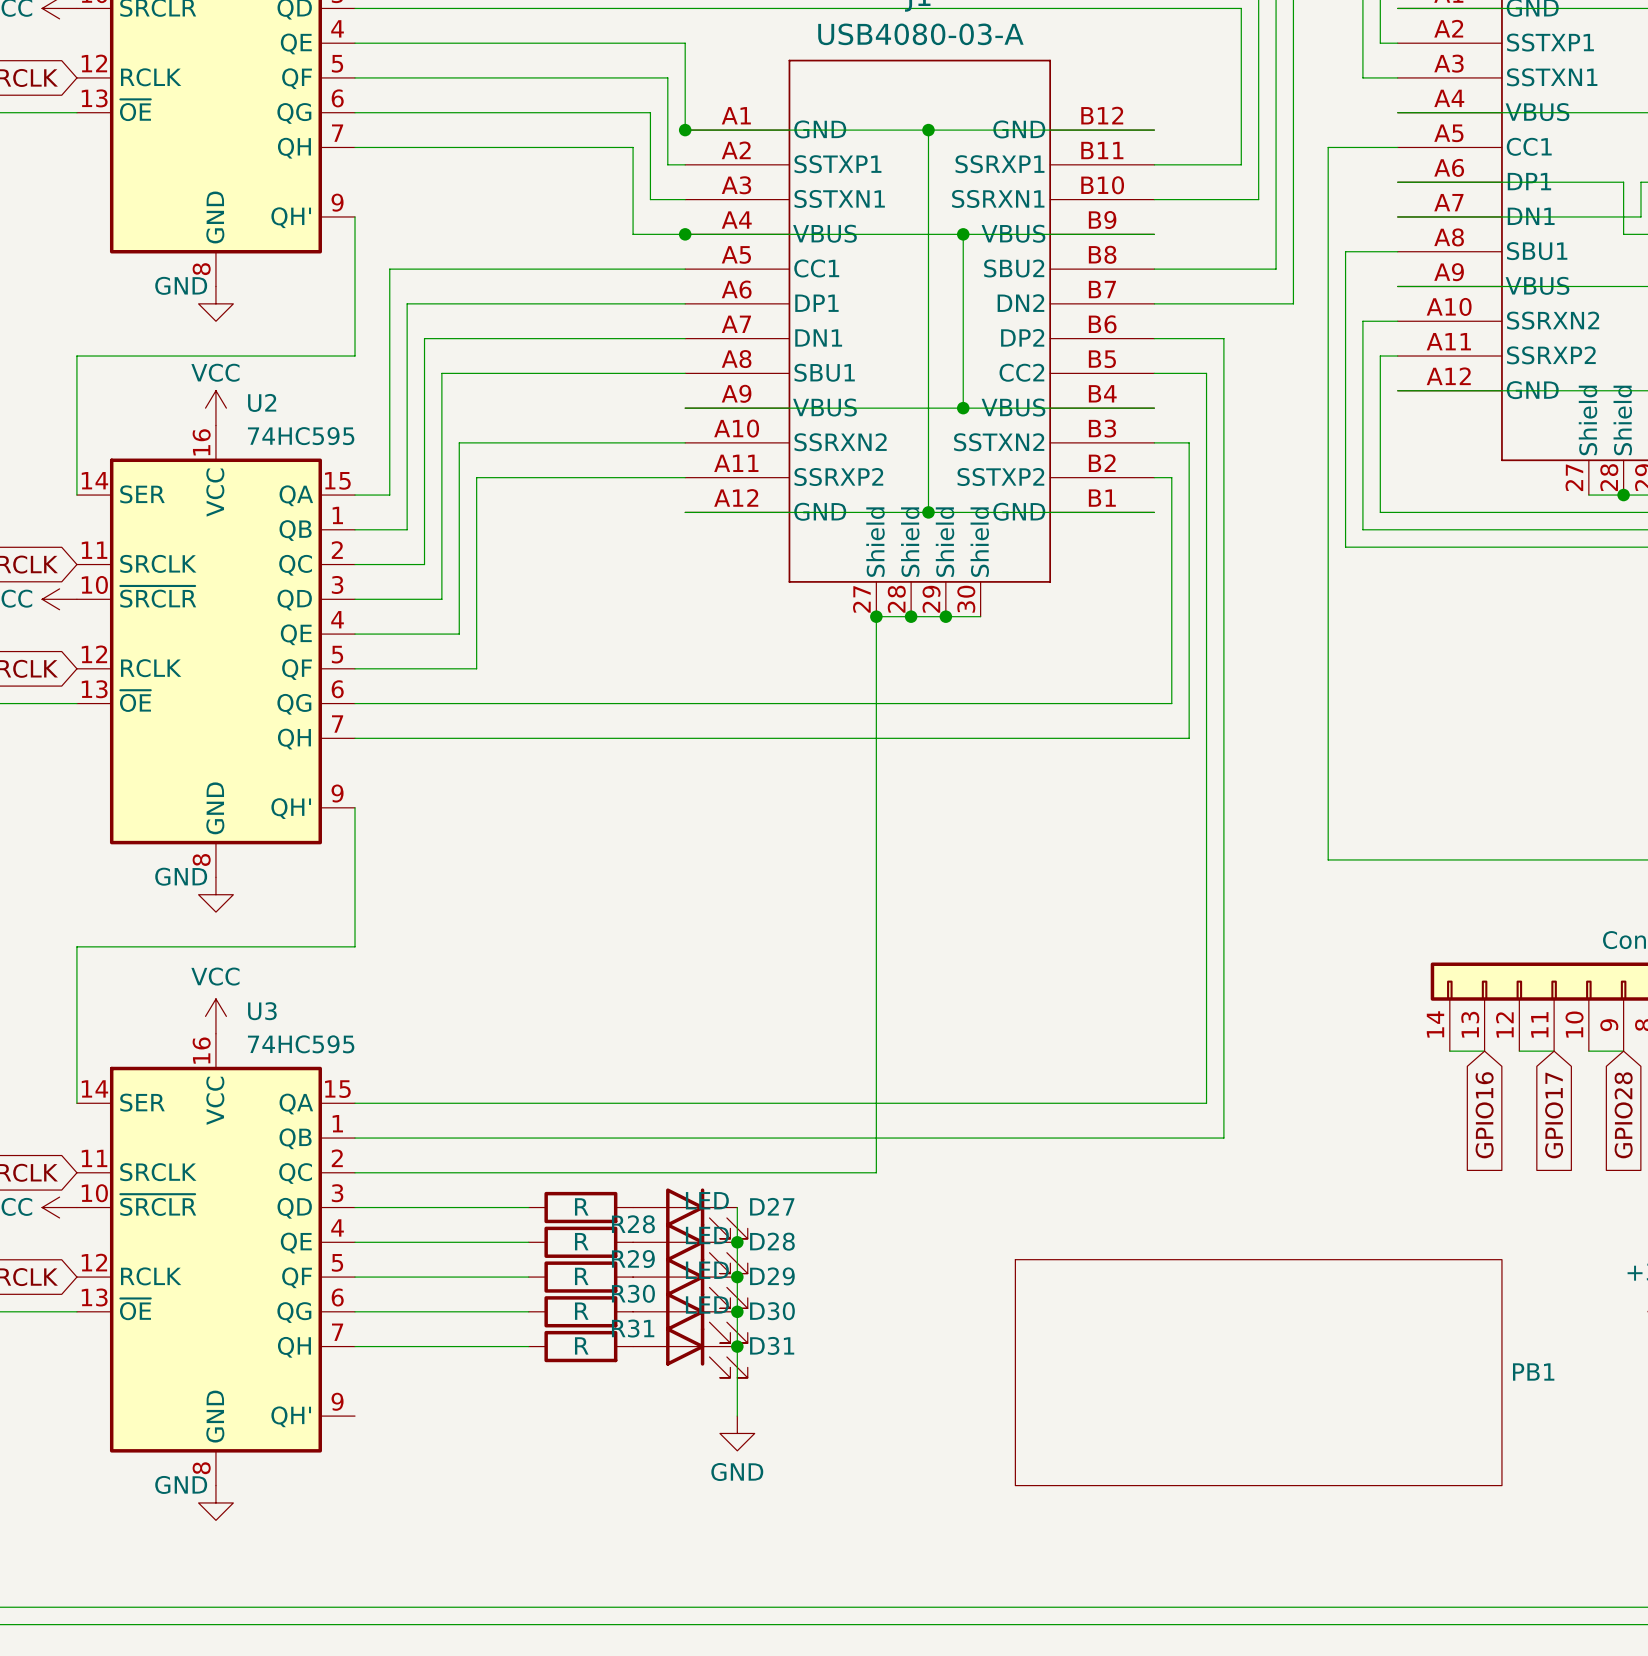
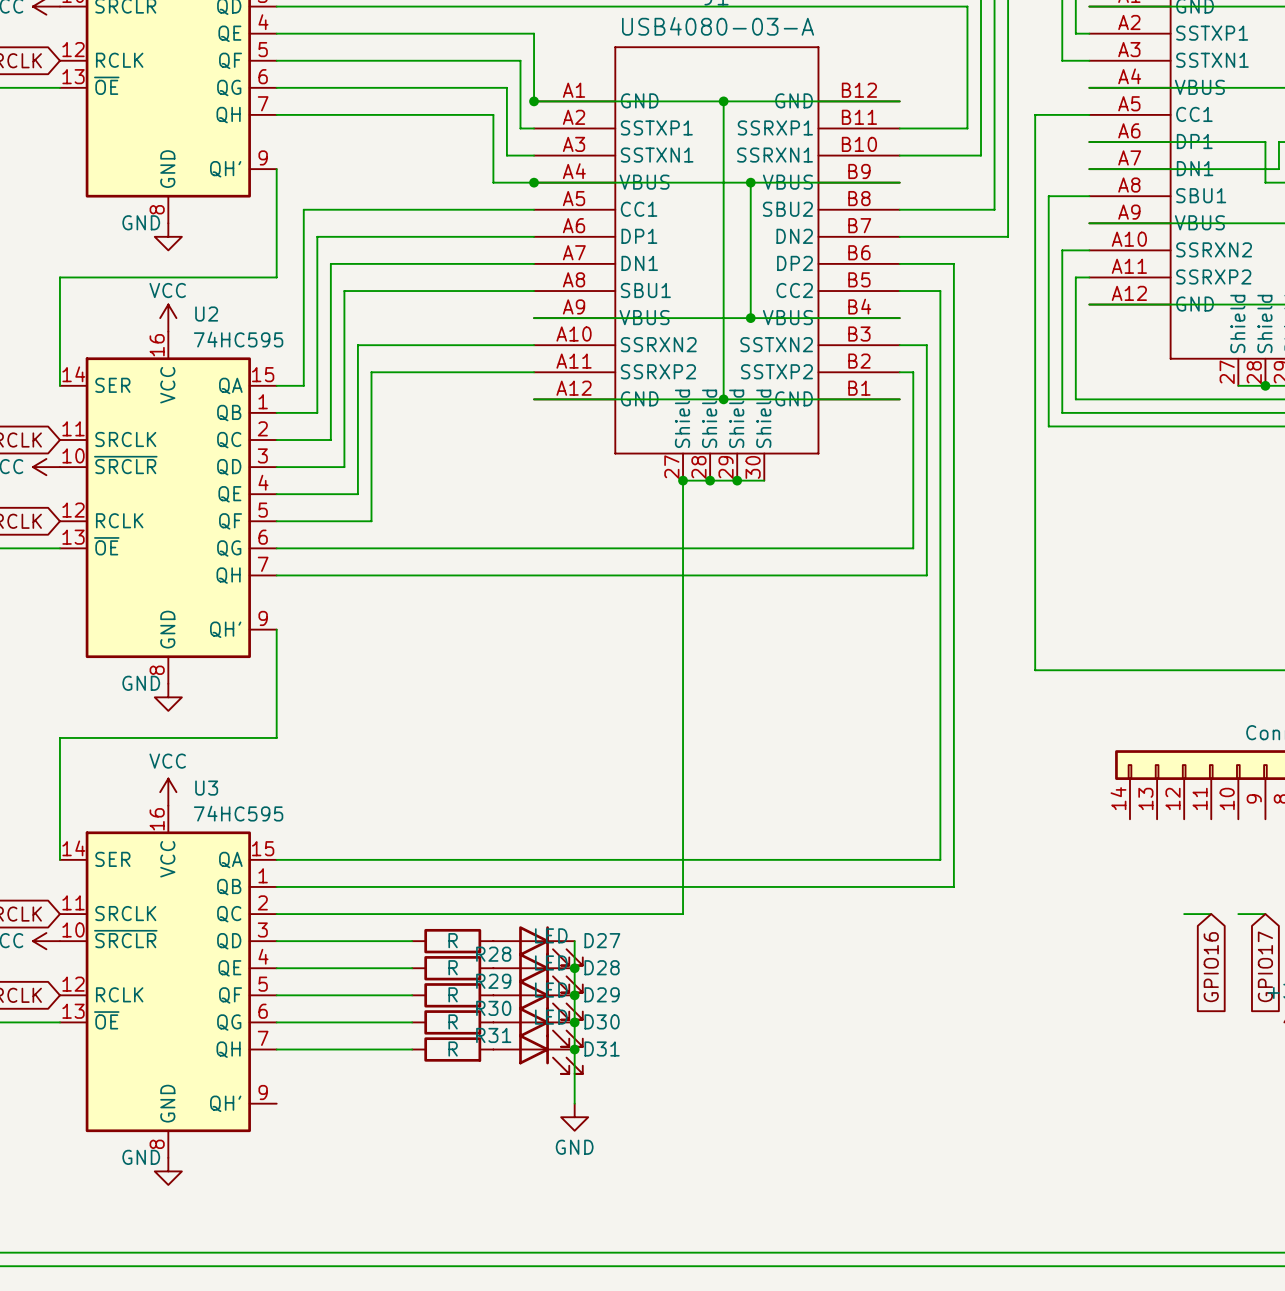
wire: (1449, 1051) (1484, 1051) -> none
wire: (1519, 1051) (1554, 1051) -> (1184, 914) (1211, 914)
wire: (1588, 1051) (1623, 1051) -> (1238, 914) (1265, 914)
global label position: GPIO16 (1484, 1115) -> GPIO16 (1211, 967)
global label position: GPIO17 (1554, 1115) -> GPIO17 (1265, 966)
global label: GPIO28 (1623, 1115) -> none
PB1: (1258, 1372) -> none

